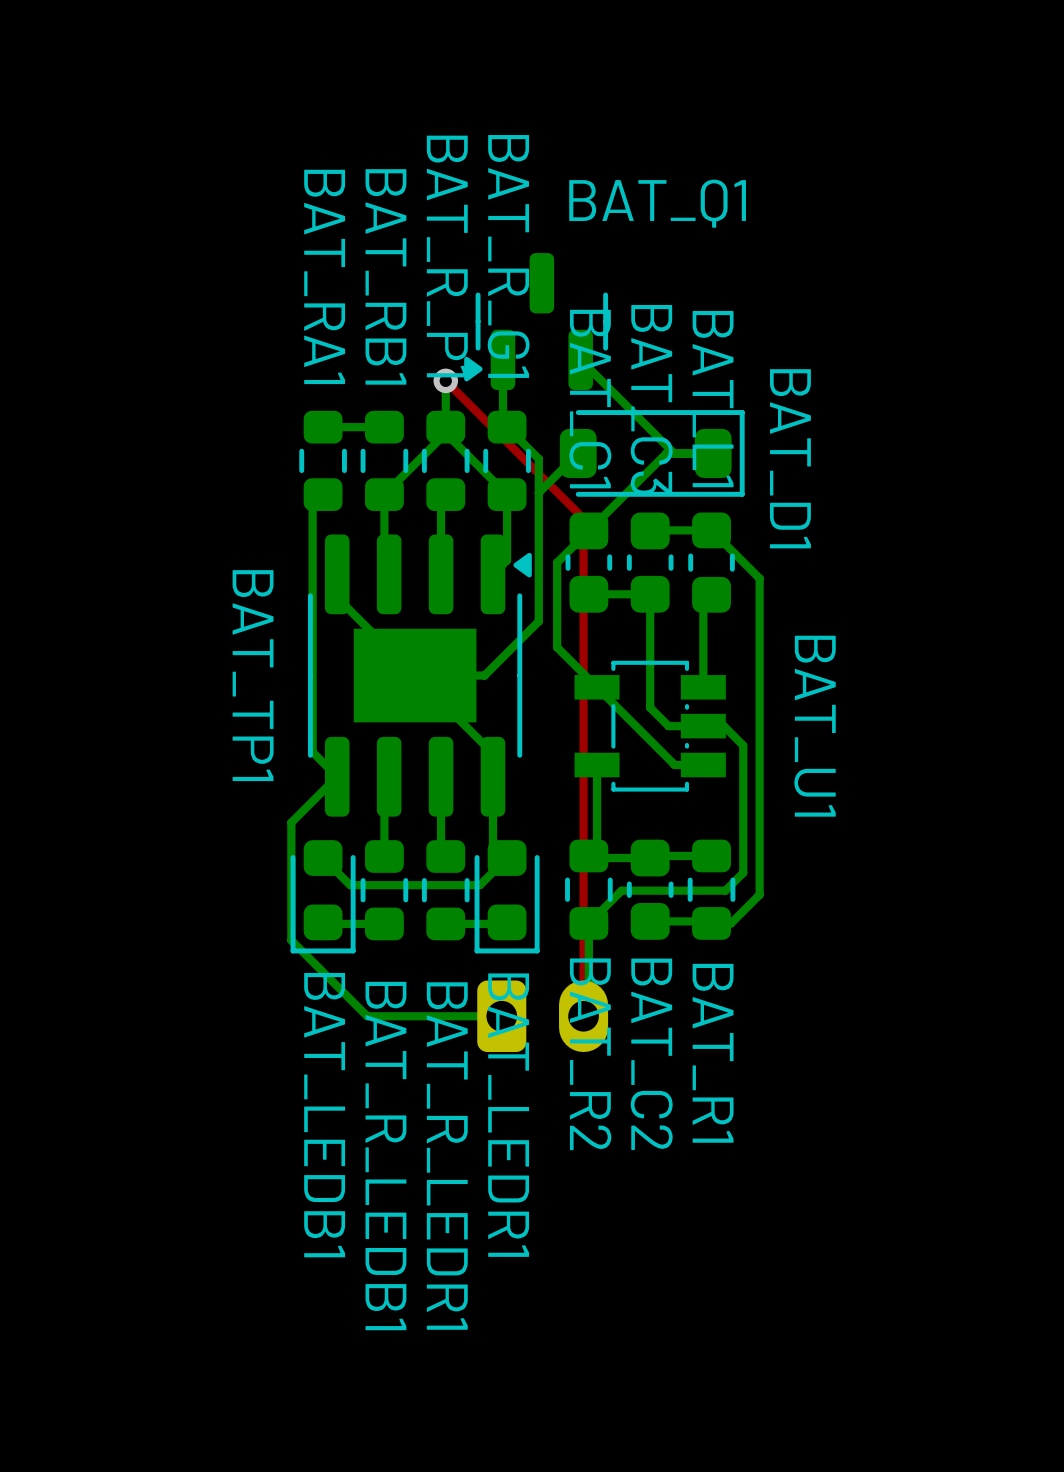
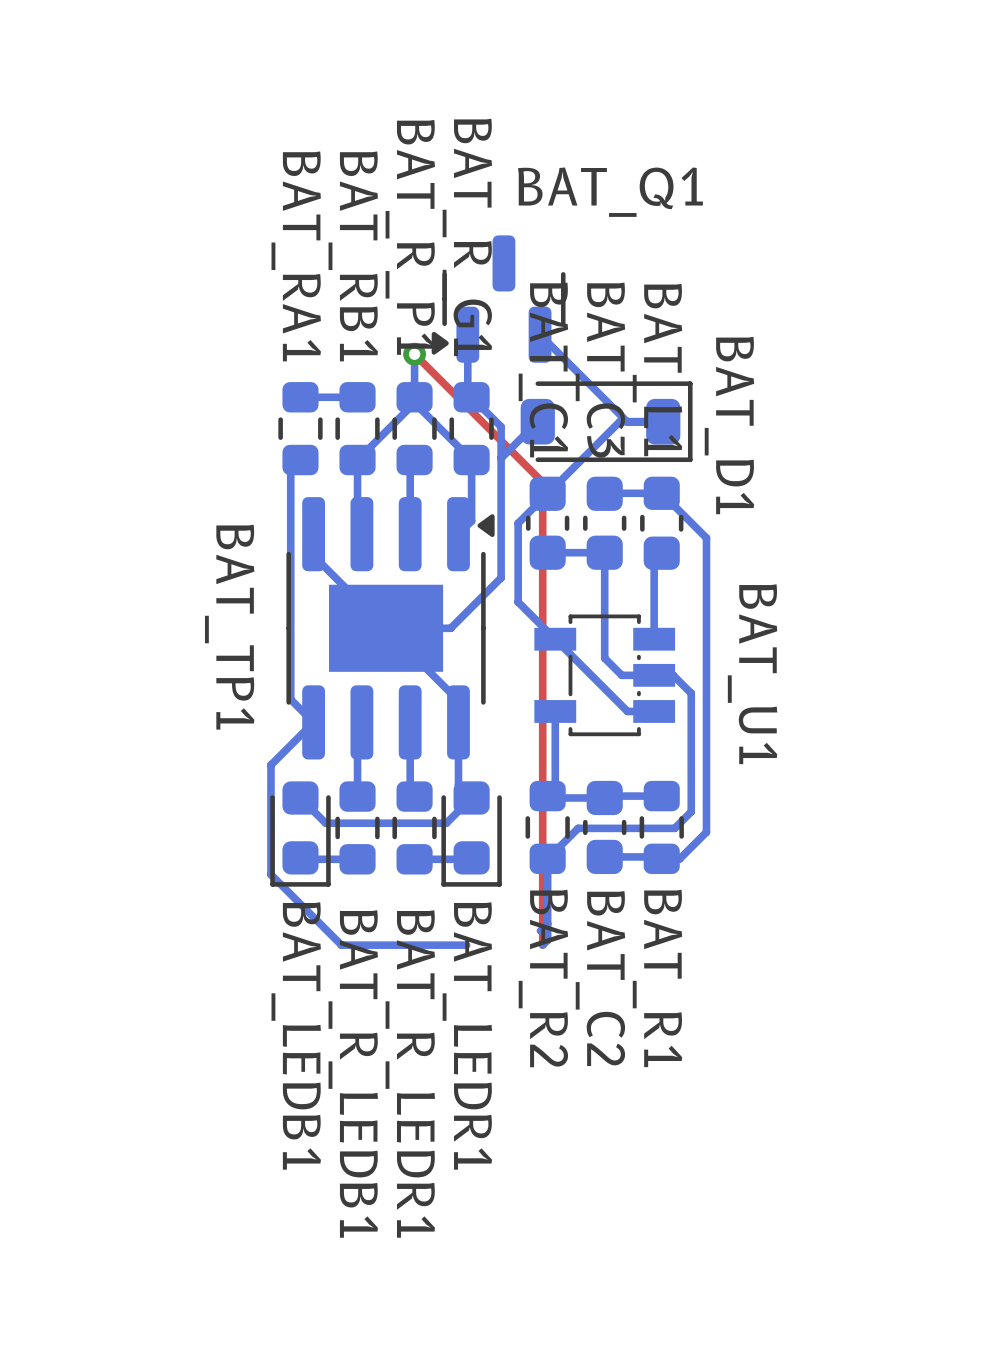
part: (542, 1016) -> none

